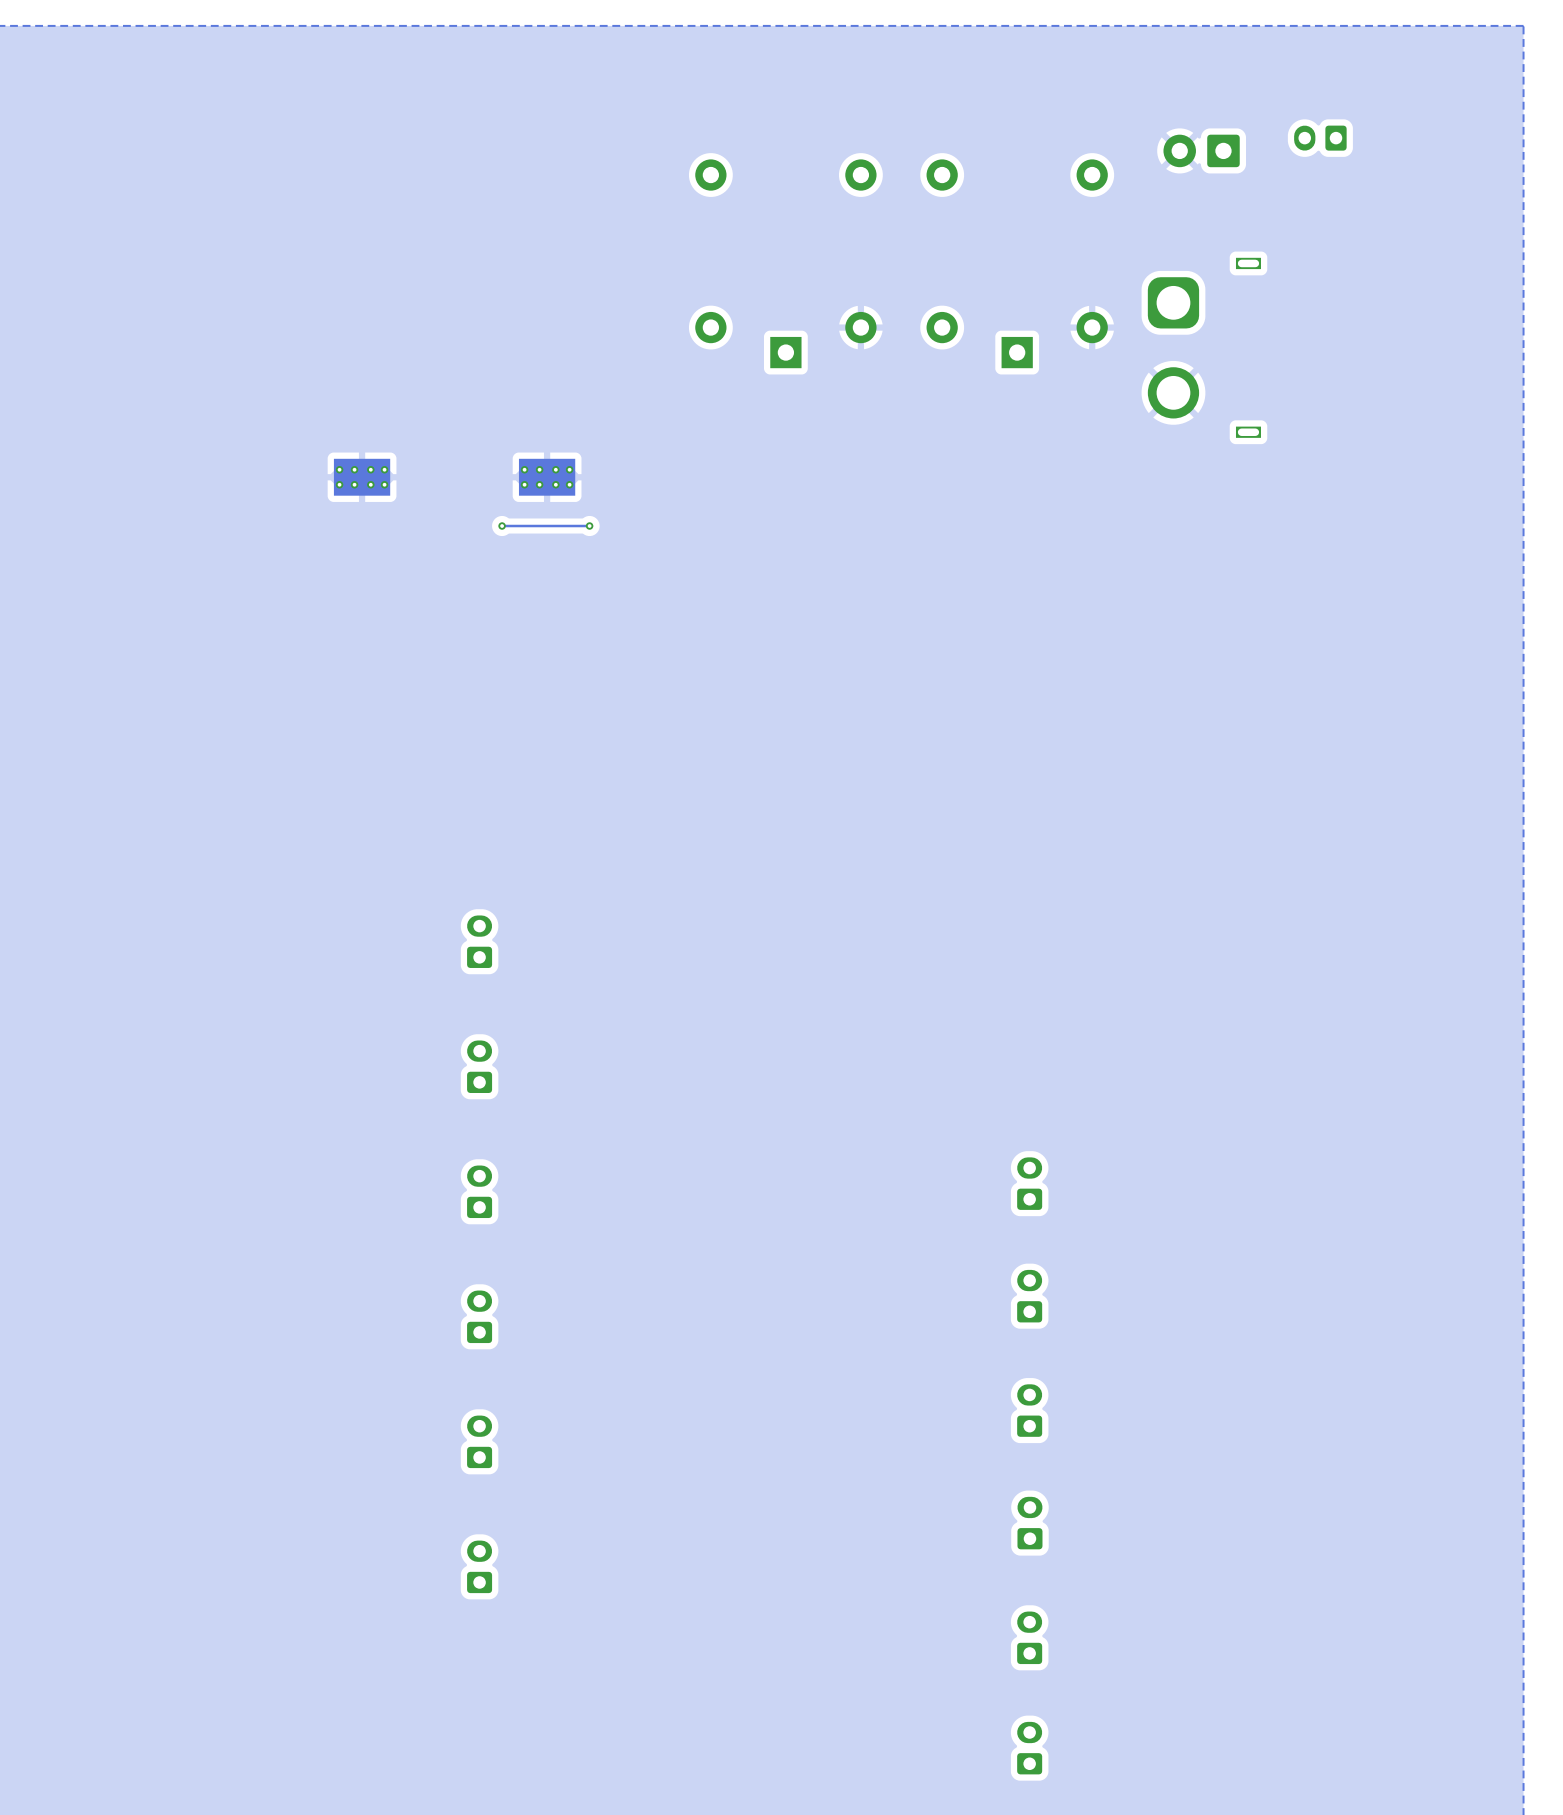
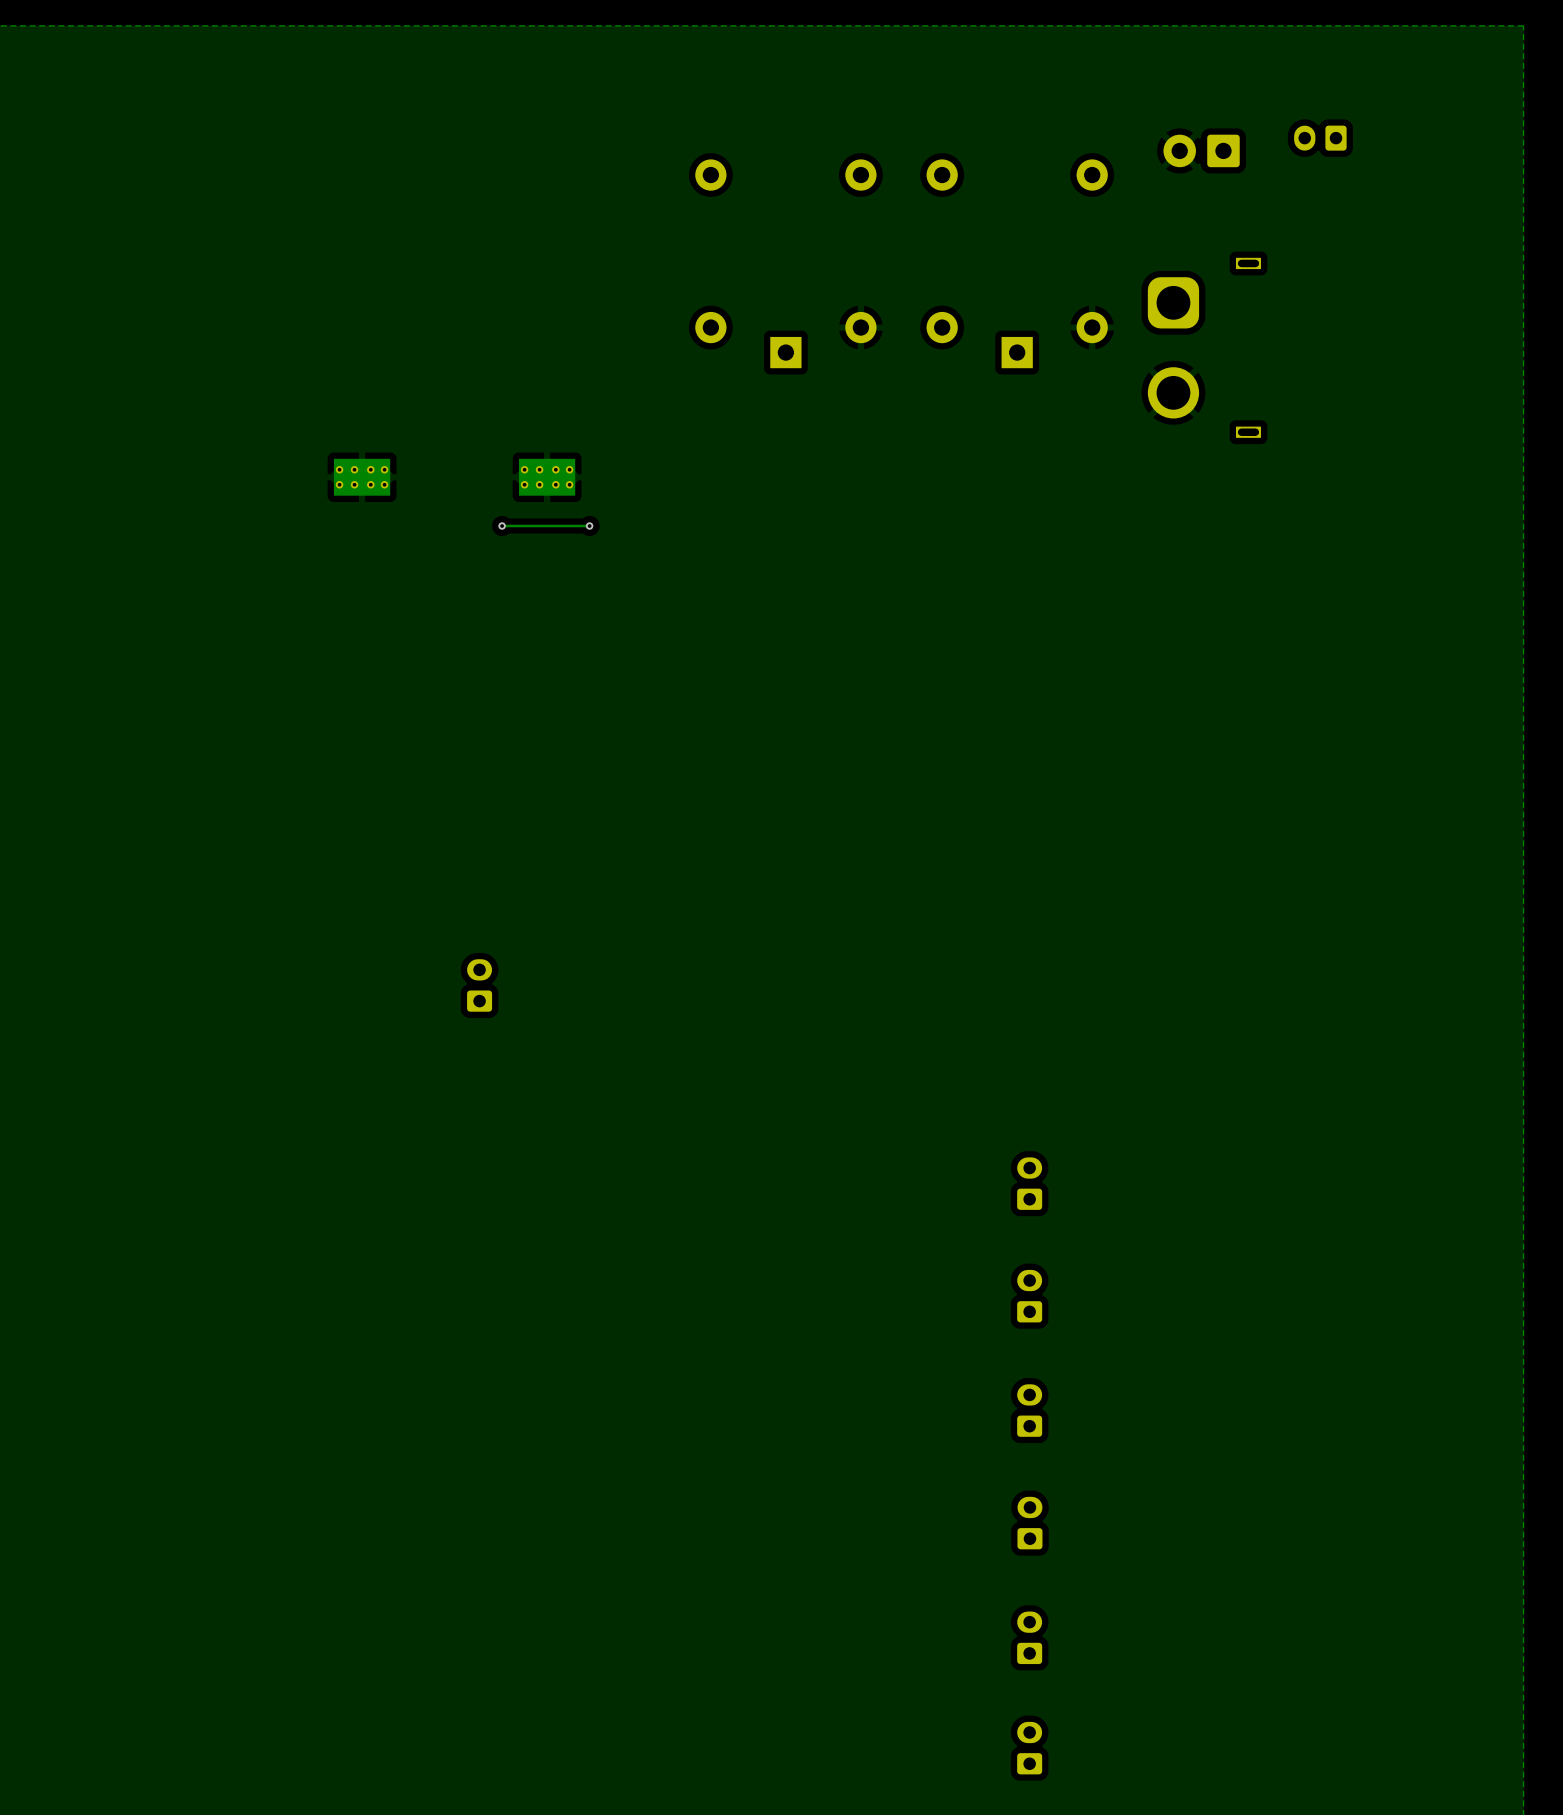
part: (479, 941) -> none
part: none -> (479, 985)
part: (479, 1066) -> none
part: (479, 1191) -> none
part: (479, 1316) -> none
part: (479, 1441) -> none
part: (479, 1566) -> none

